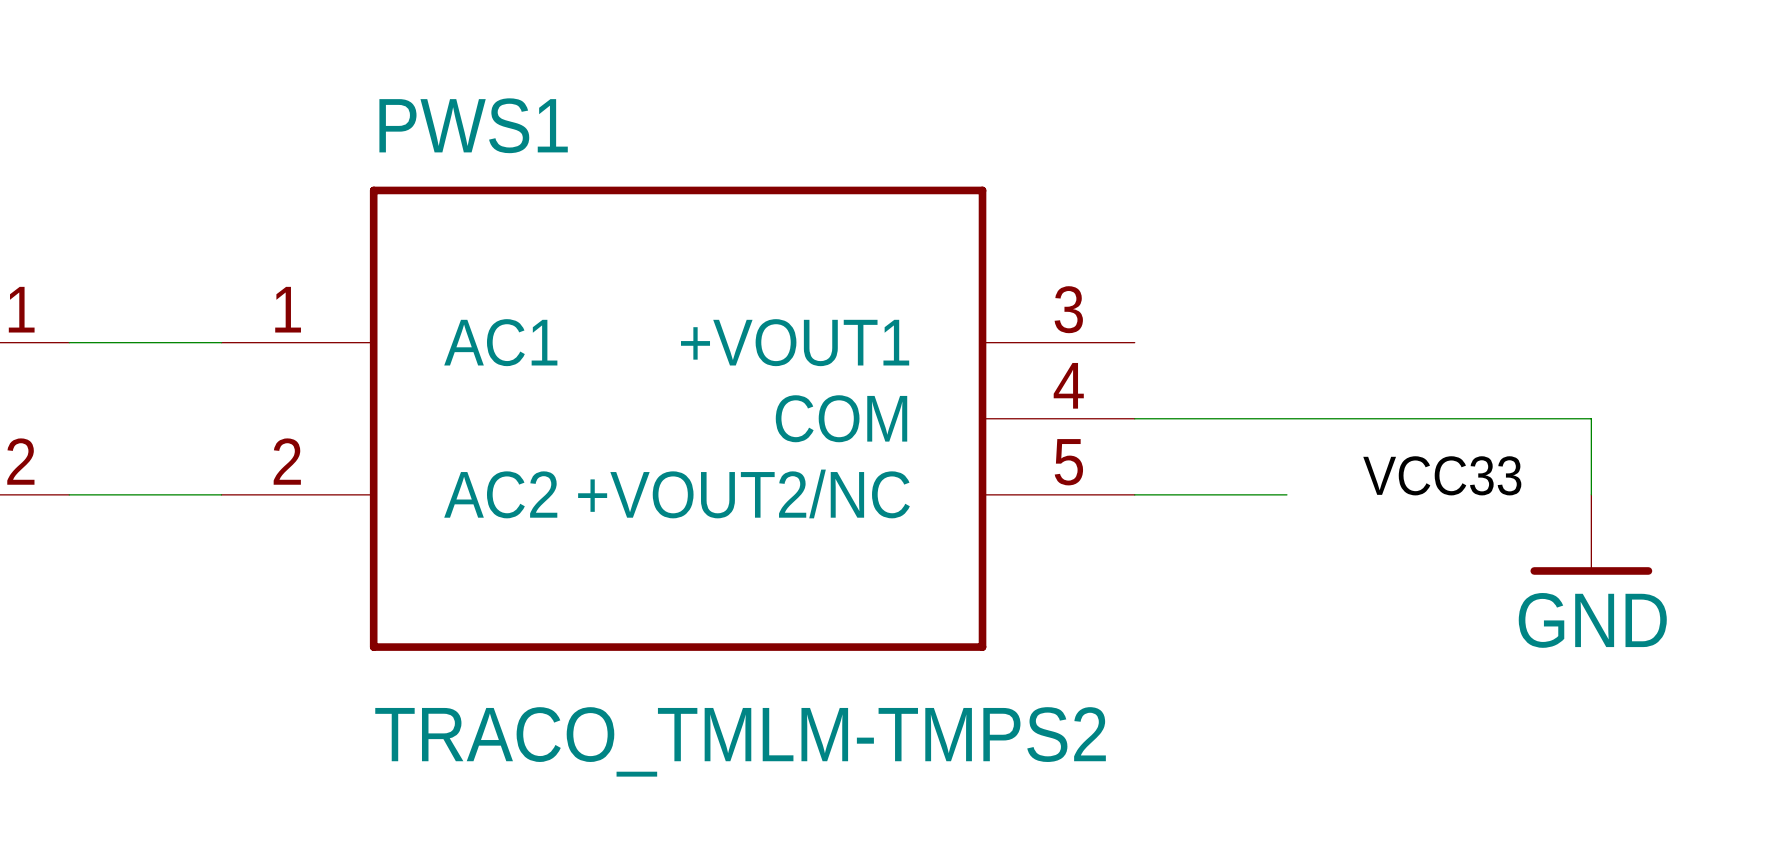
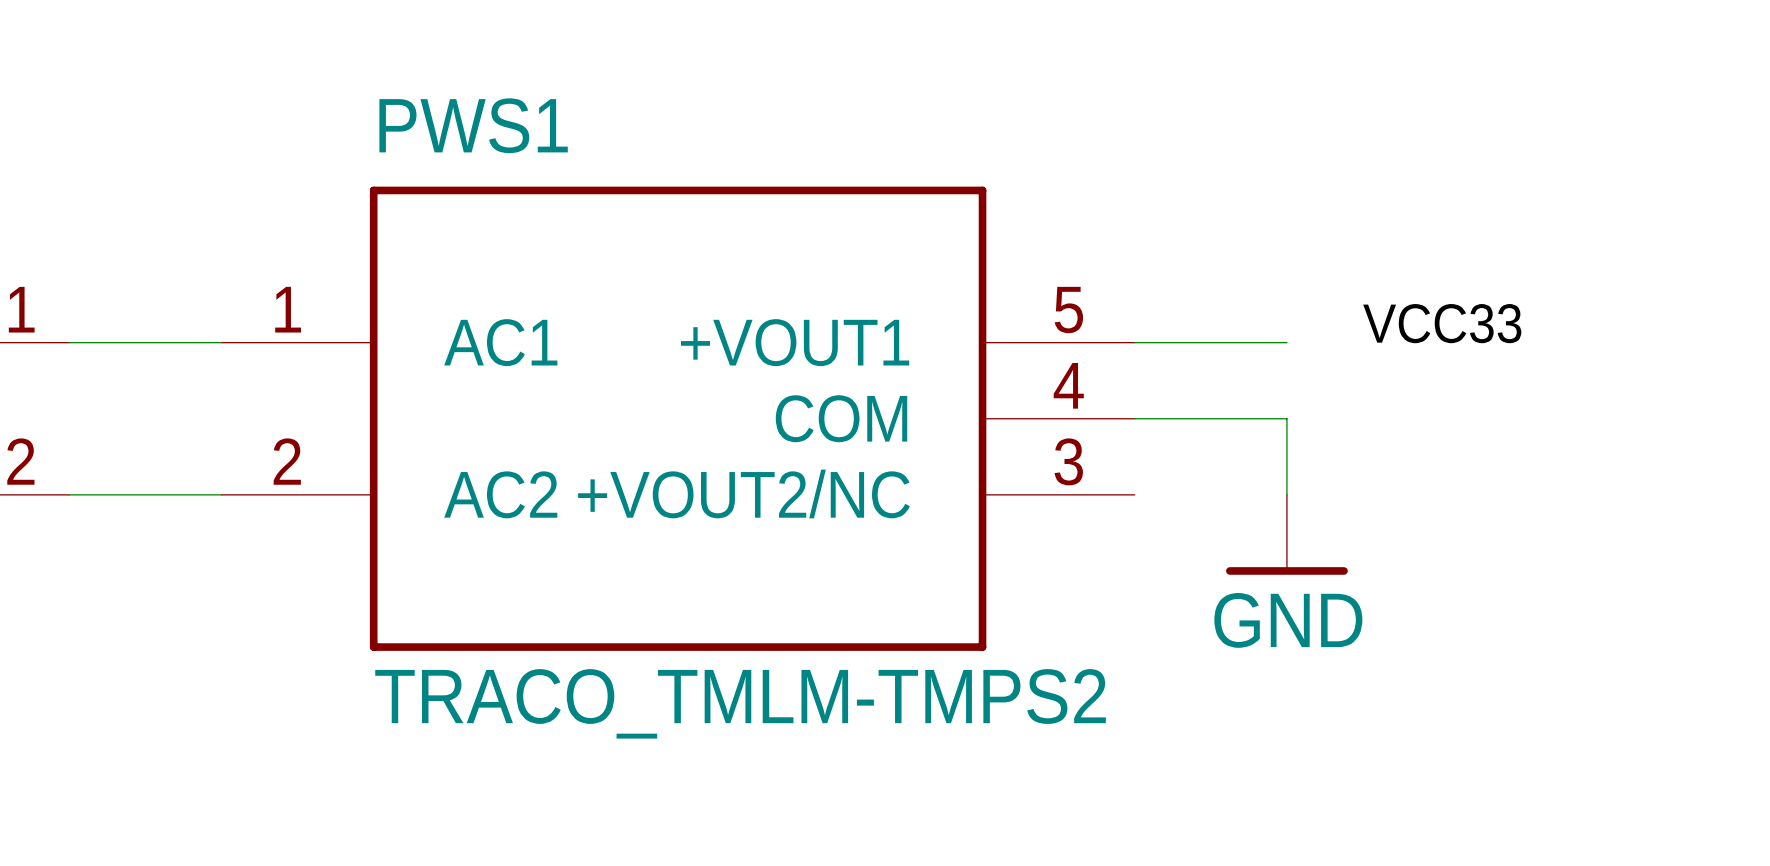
PWS1 pin number: 3 (1068, 309) -> 5 (1068, 310)
wire: none -> (1134, 342) (1286, 342)
wire: (1286, 418) (1591, 418) (1591, 494) -> none
PWS1 pin number: 5 (1068, 462) -> 3 (1068, 461)
label position: VCC33 (1442, 475) -> VCC33 (1442, 323)
wire: (1134, 494) (1286, 494) -> (1286, 418) (1286, 494)
power symbol position: GND (1591, 534) -> GND (1286, 534)
PWS1 value position: TRACO_TMLM-TMPS2 (740, 741) -> TRACO_TMLM-TMPS2 (740, 703)

